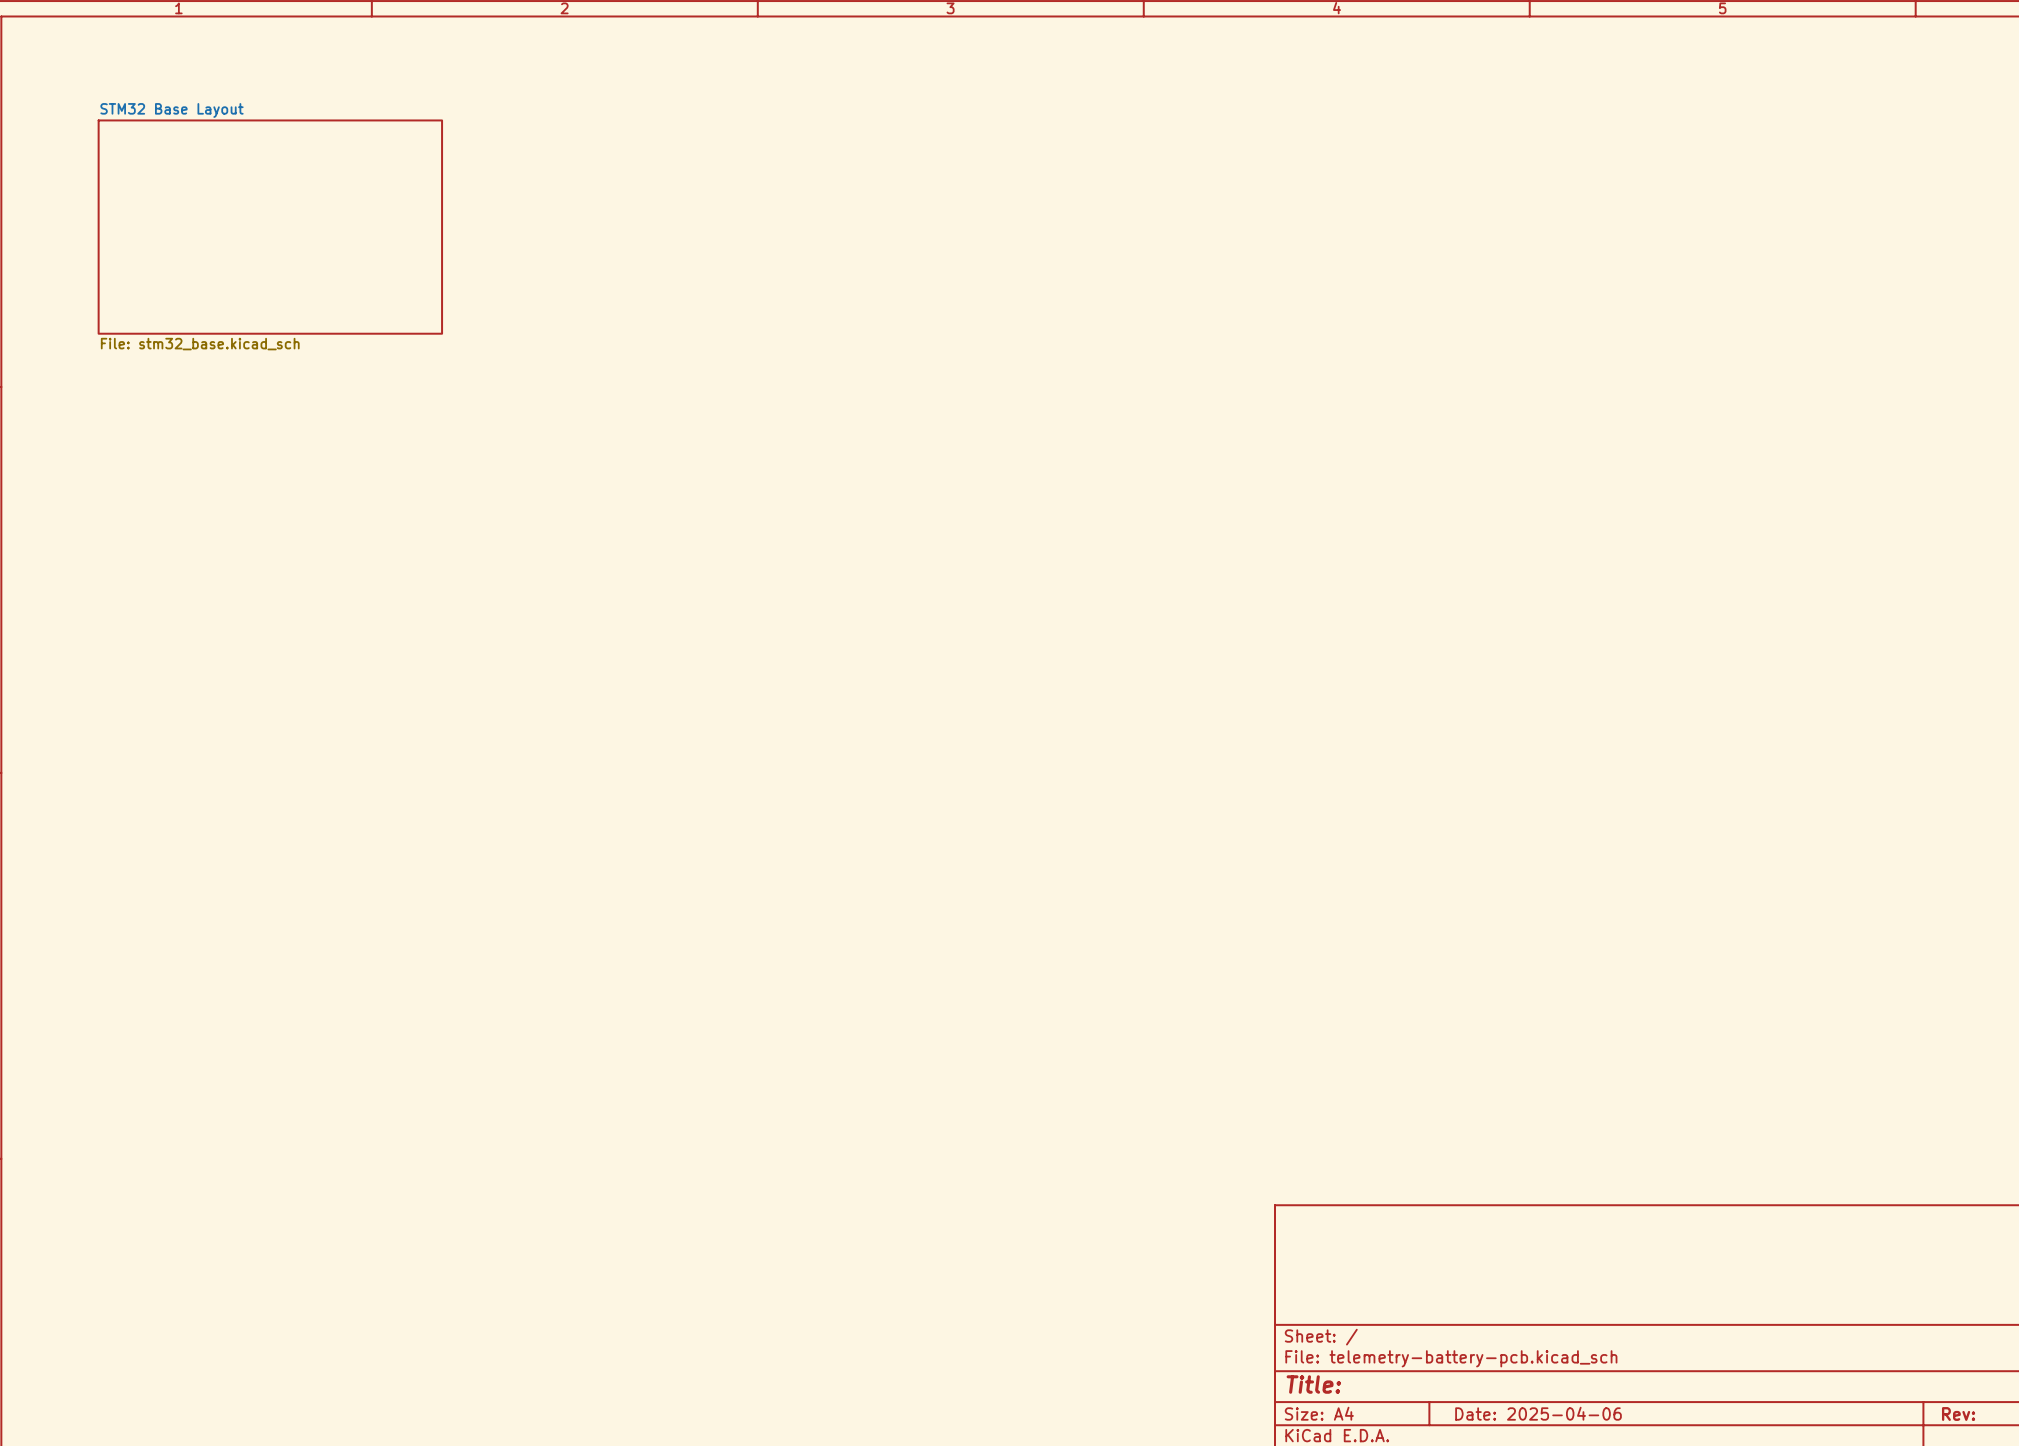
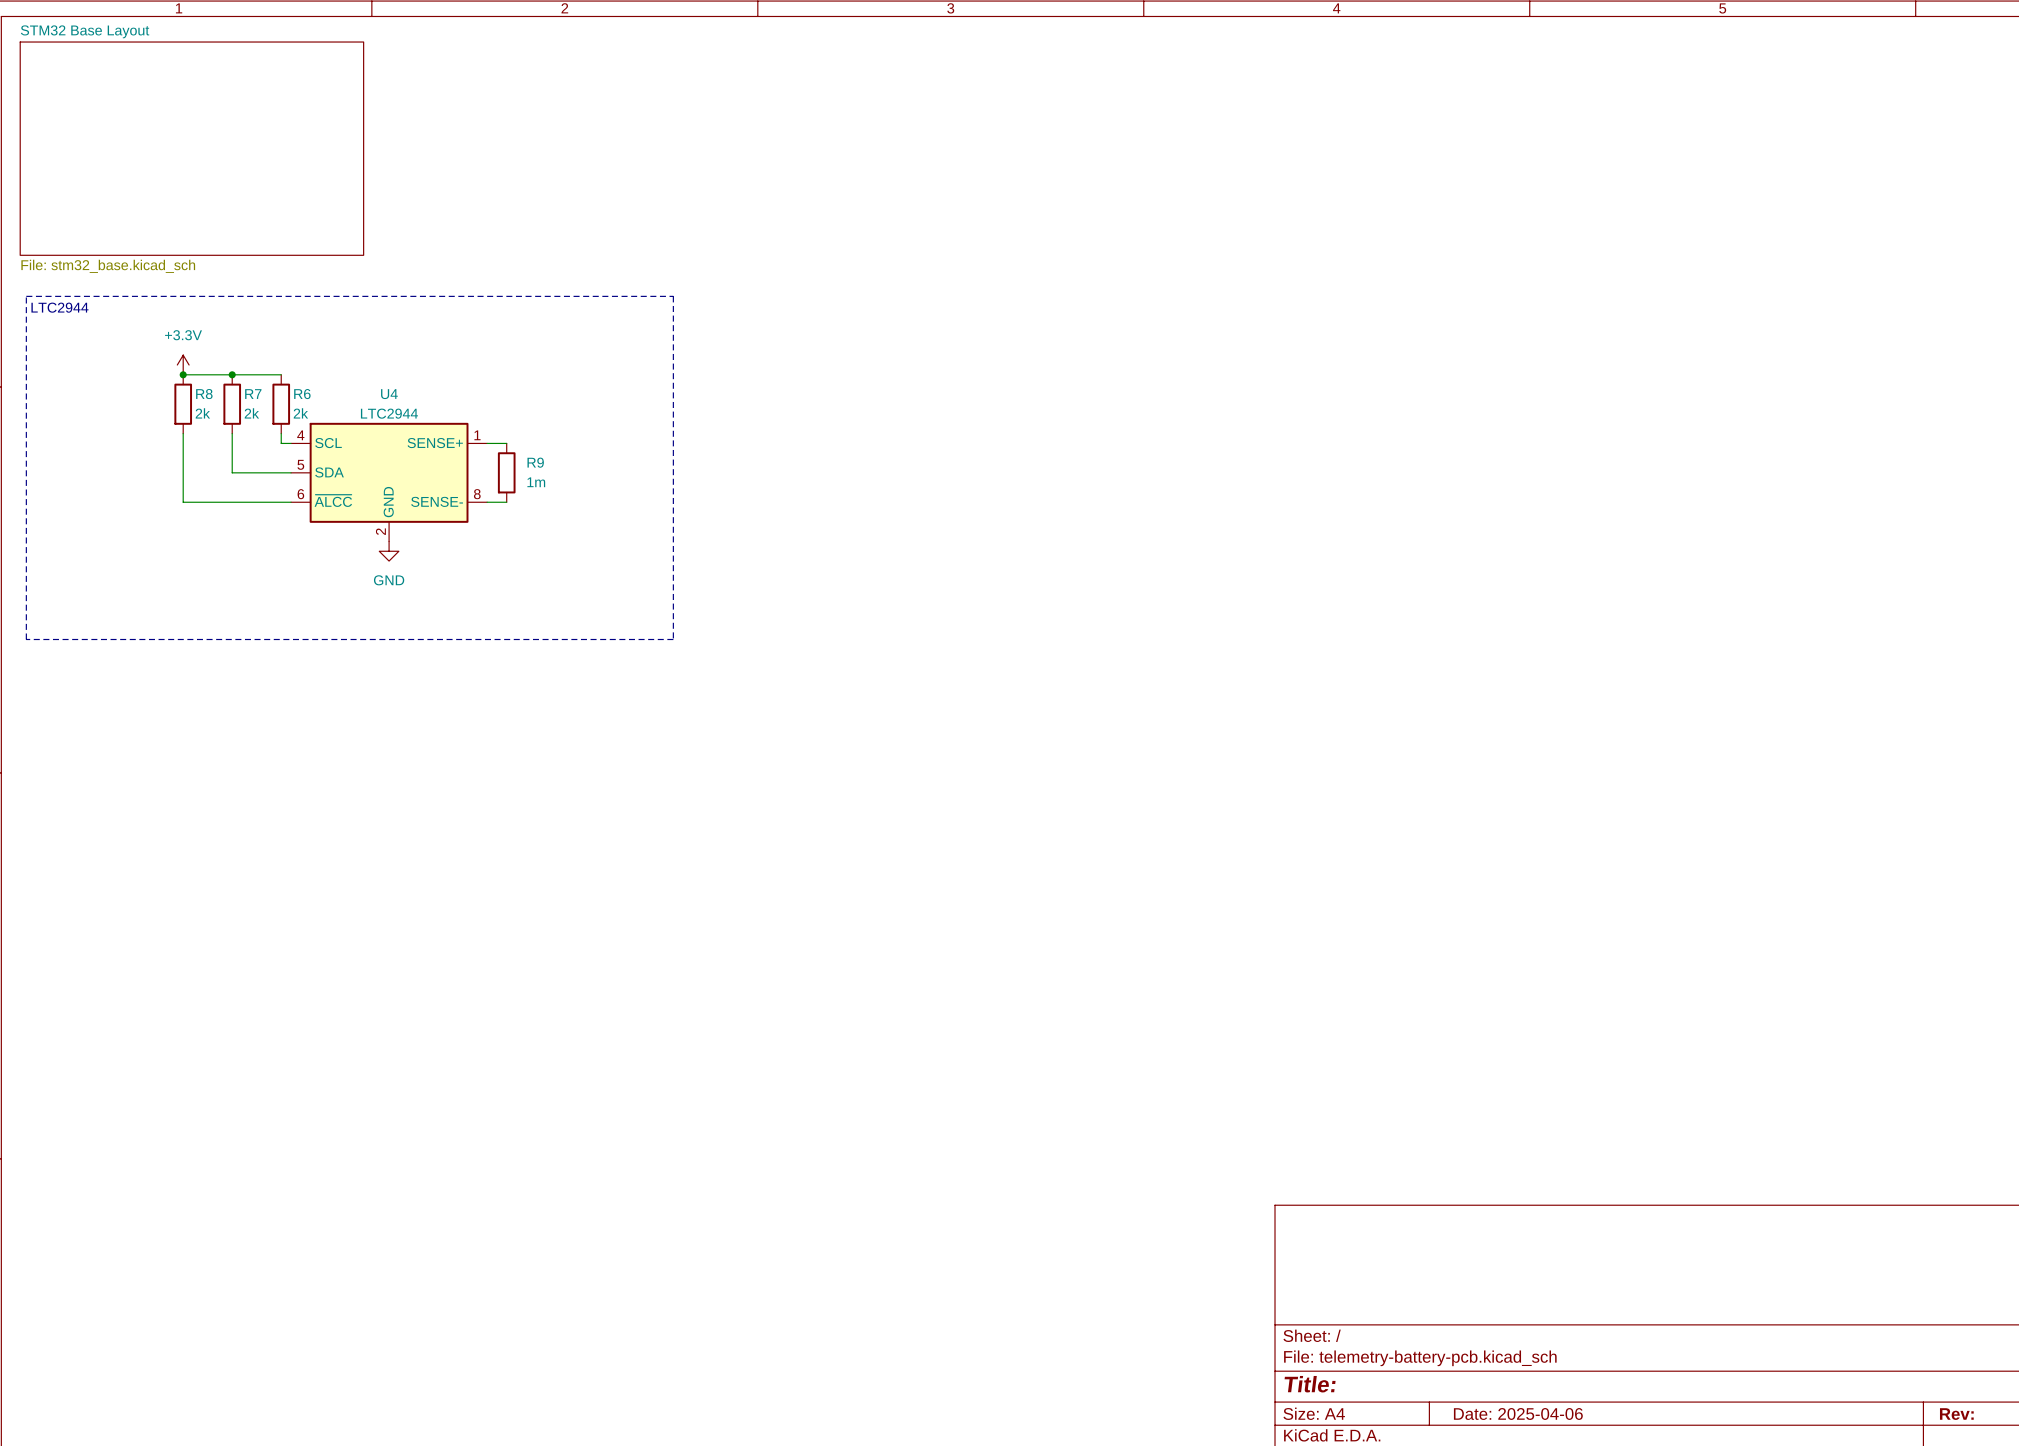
sheet STM32 Base Layout position: (270, 227) -> (191, 148)
line: none -> (26, 296) (673, 296) (673, 639) (26, 639) (26, 296)
text: none -> LTC2944 (59, 307)
power symbol: none -> +3.3V (183, 365)
wire: none -> (183, 374) (281, 374)
junction: none -> (183, 374)
junction: none -> (232, 374)
R8: none -> 2k (183, 404)
R7: none -> 2k (232, 404)
R6: none -> 2k (281, 404)
wire: none -> (183, 433) (183, 502) (291, 502)
wire: none -> (232, 433) (232, 472) (291, 472)
wire: none -> (281, 433) (281, 443) (291, 443)
wire: none -> (487, 443) (506, 443)
R9: none -> 1m (506, 472)
U4: none -> LTC2944 (389, 482)
wire: none -> (487, 502) (506, 502)
power symbol: none -> GND (389, 551)

